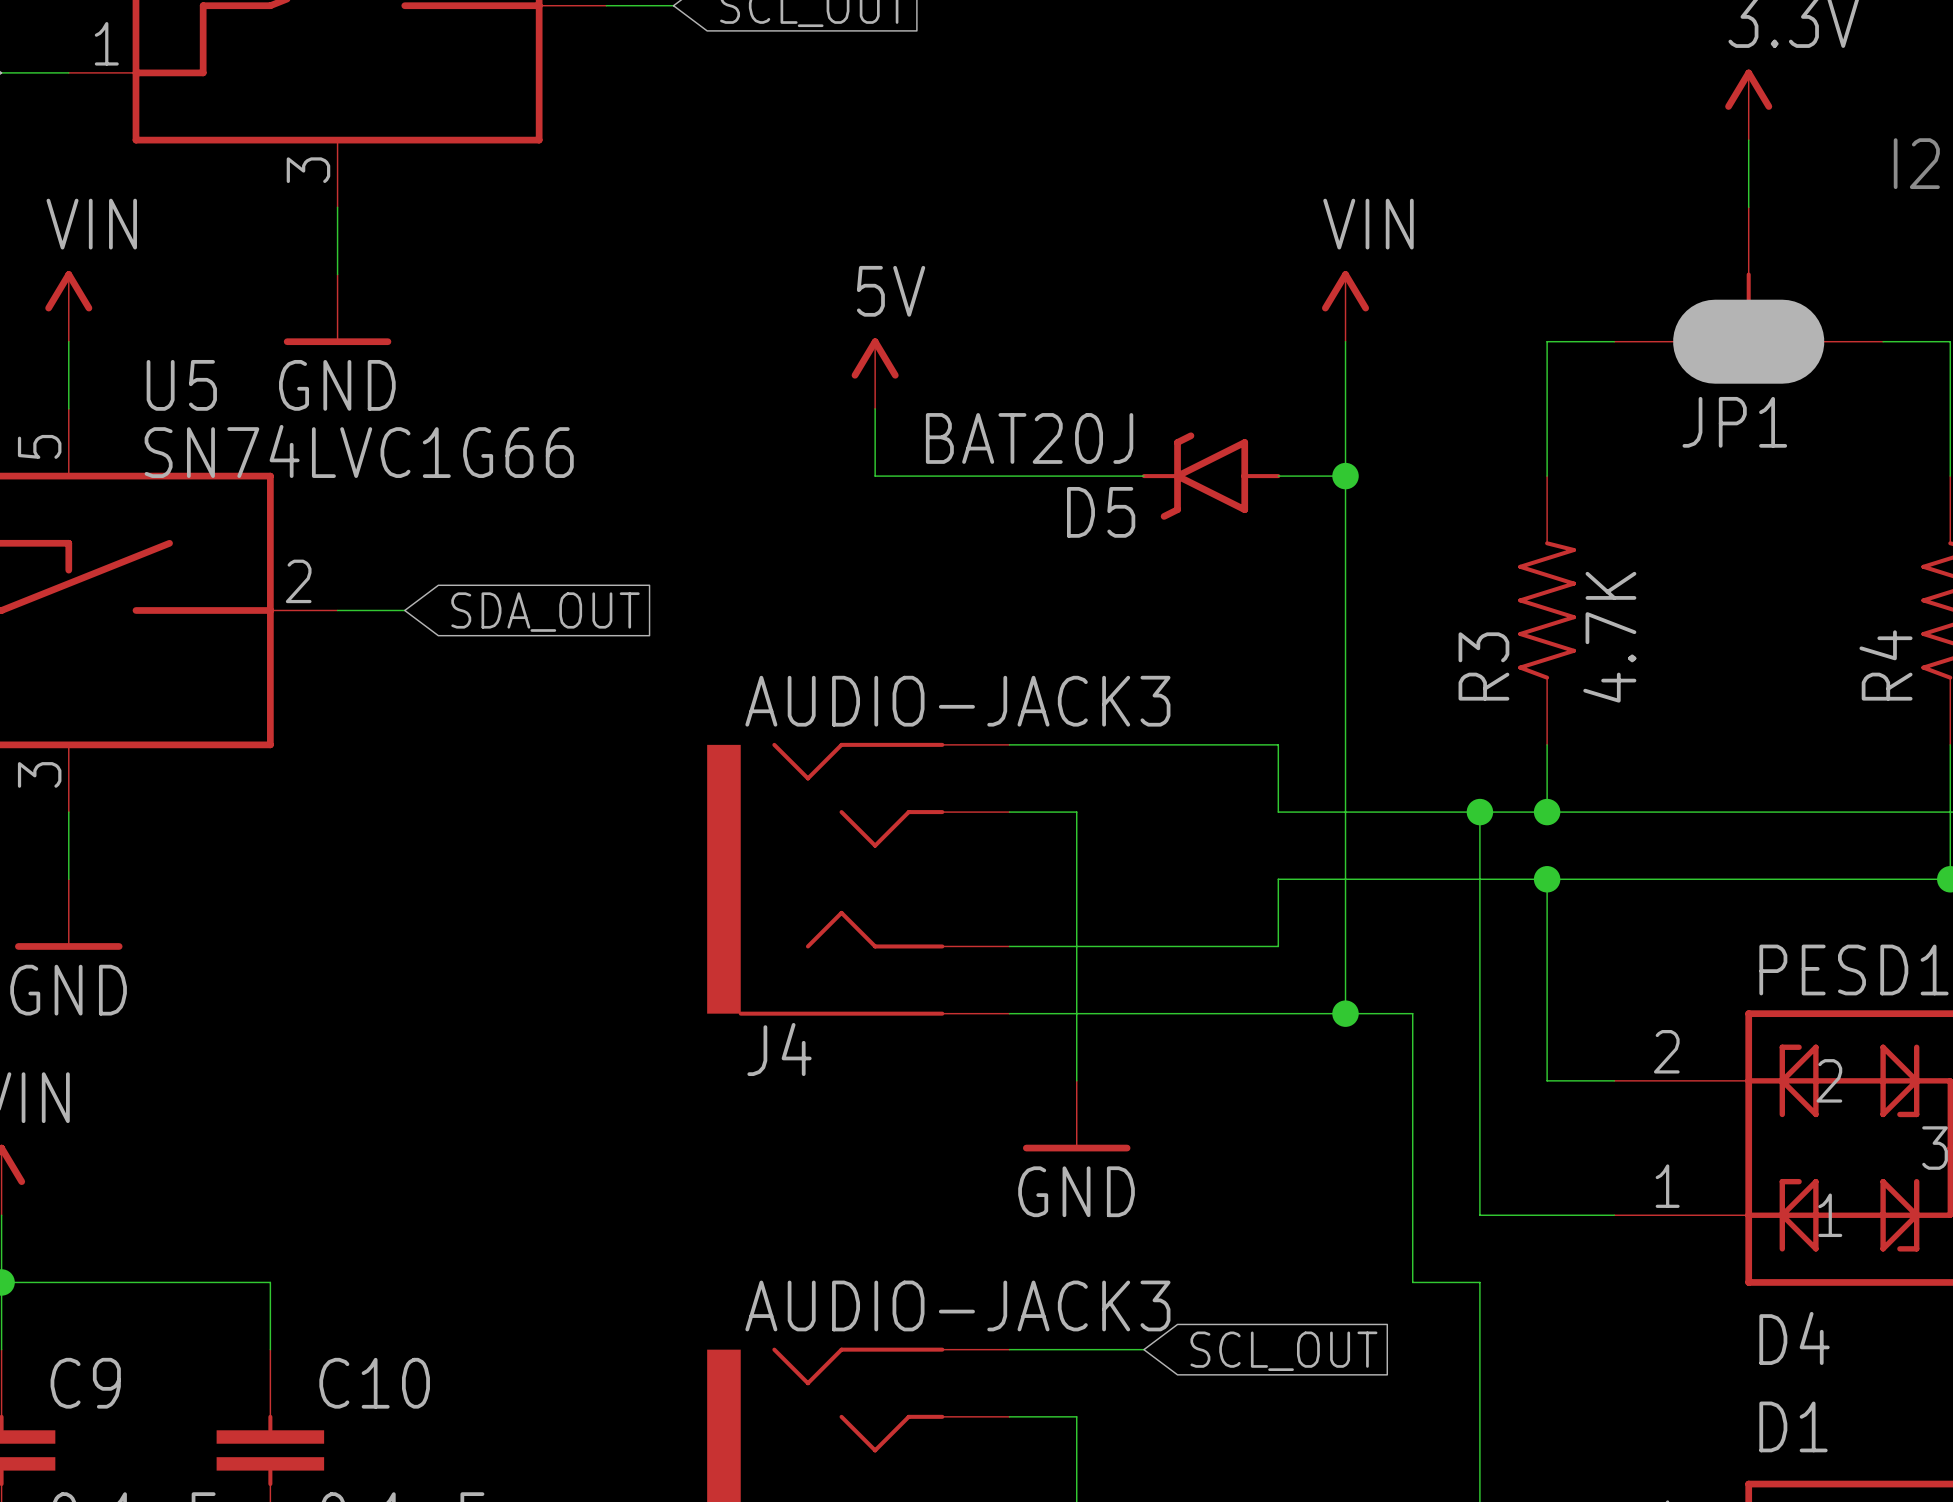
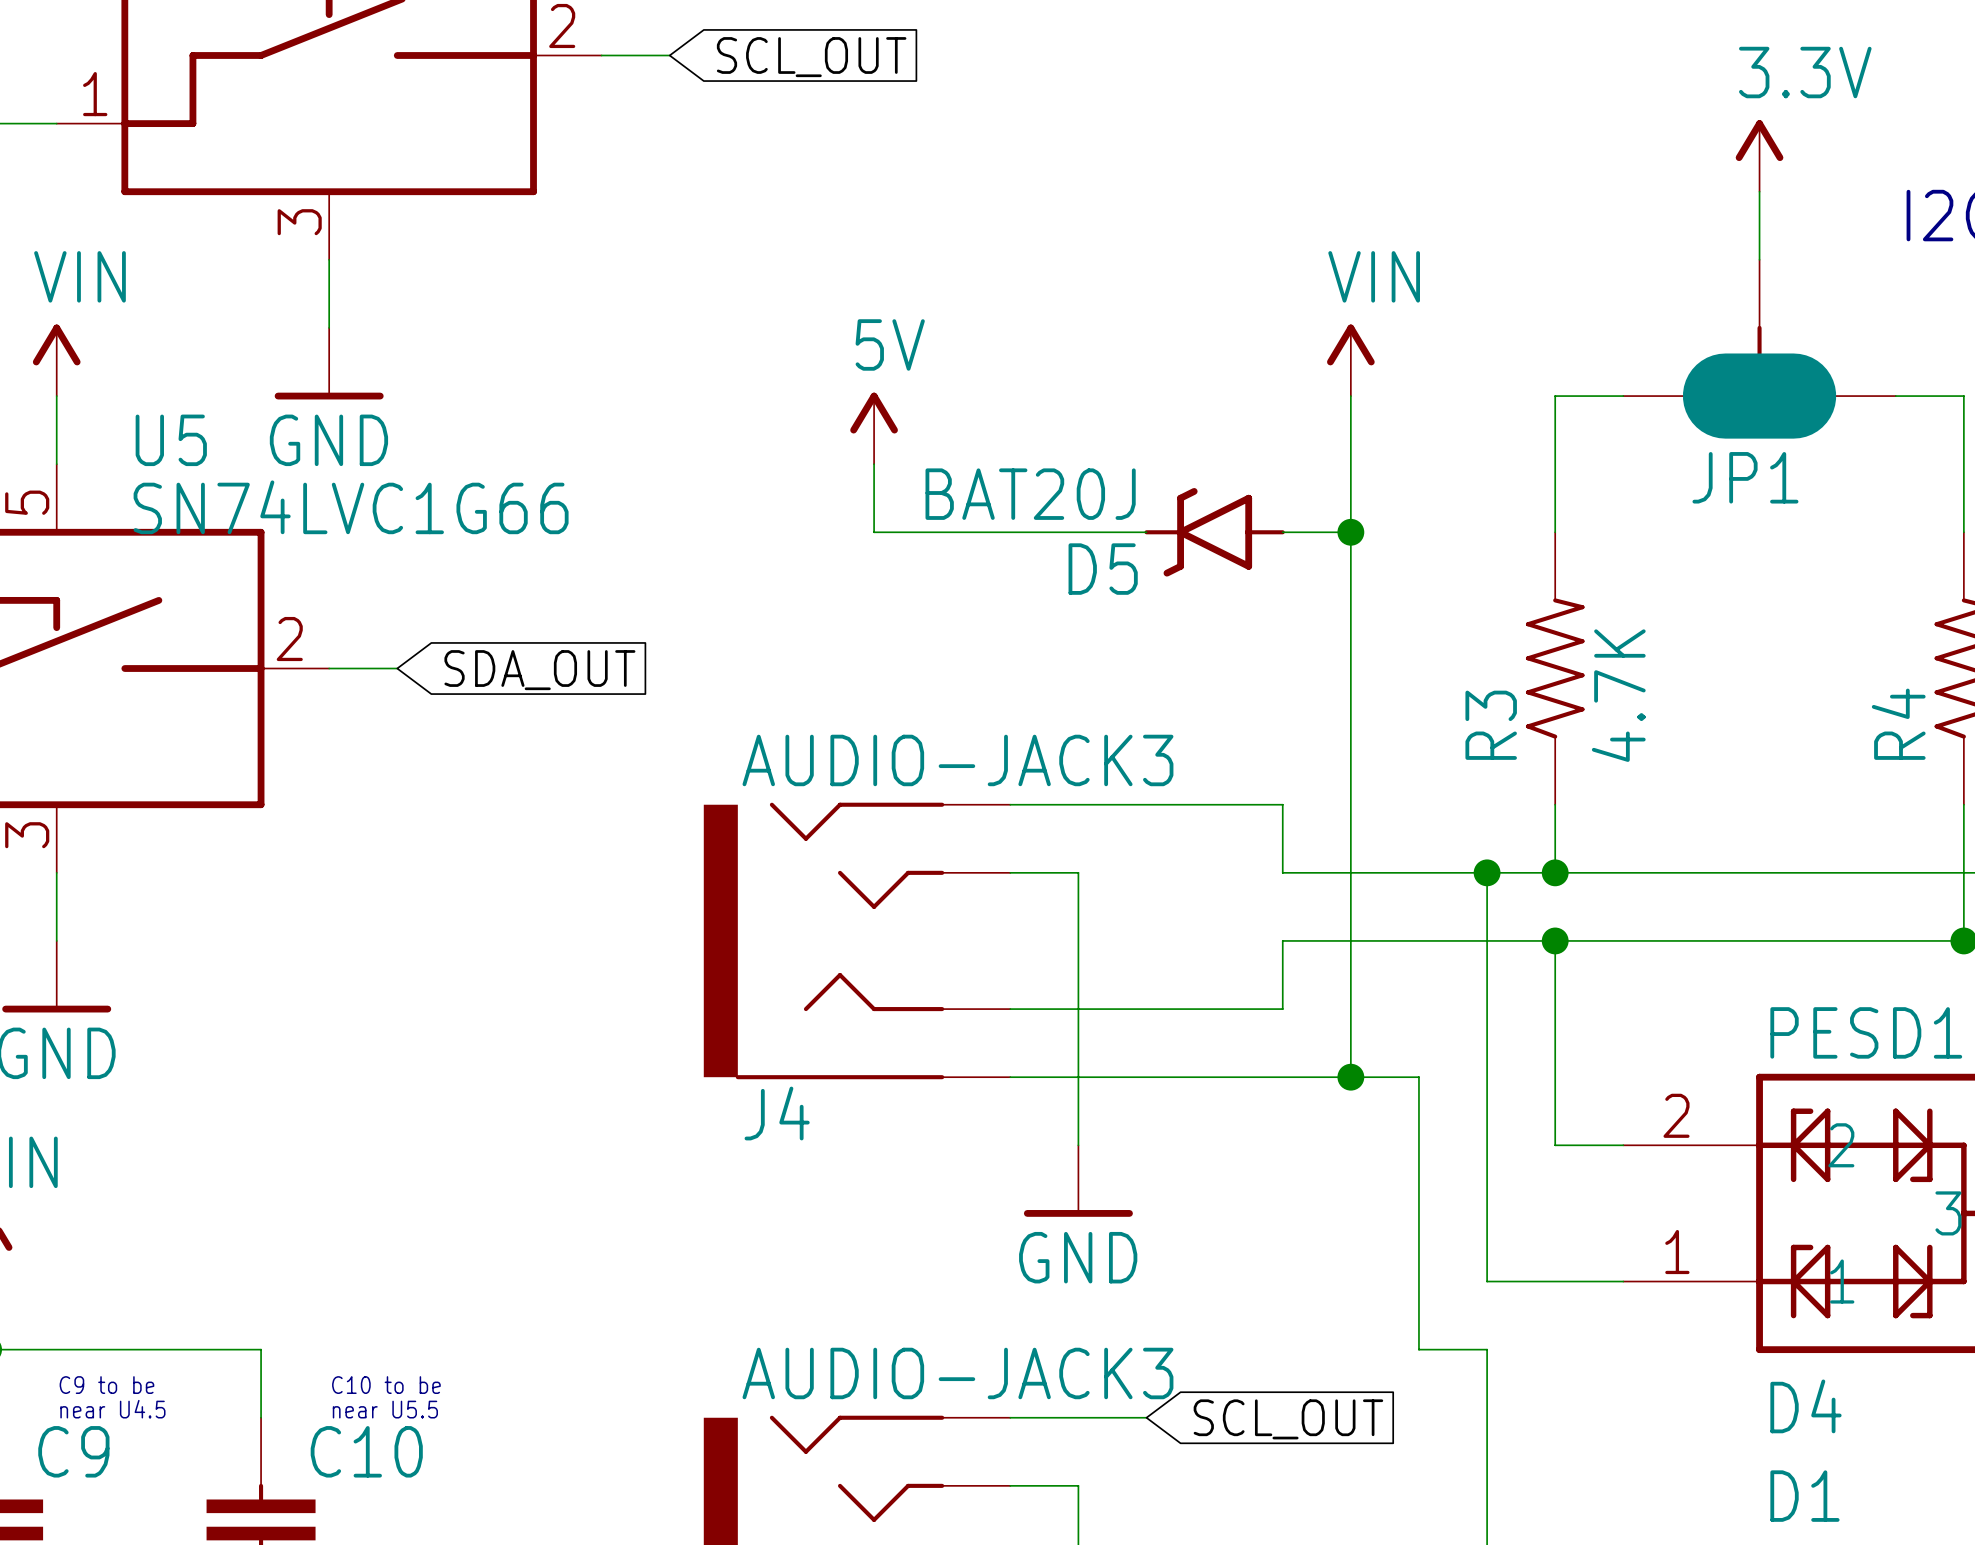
text: none -> C9 to be (106, 1385)
text: none -> C10 to be (386, 1385)
text: none -> near U4.5 (112, 1409)
text: none -> near U5.5 (385, 1409)

